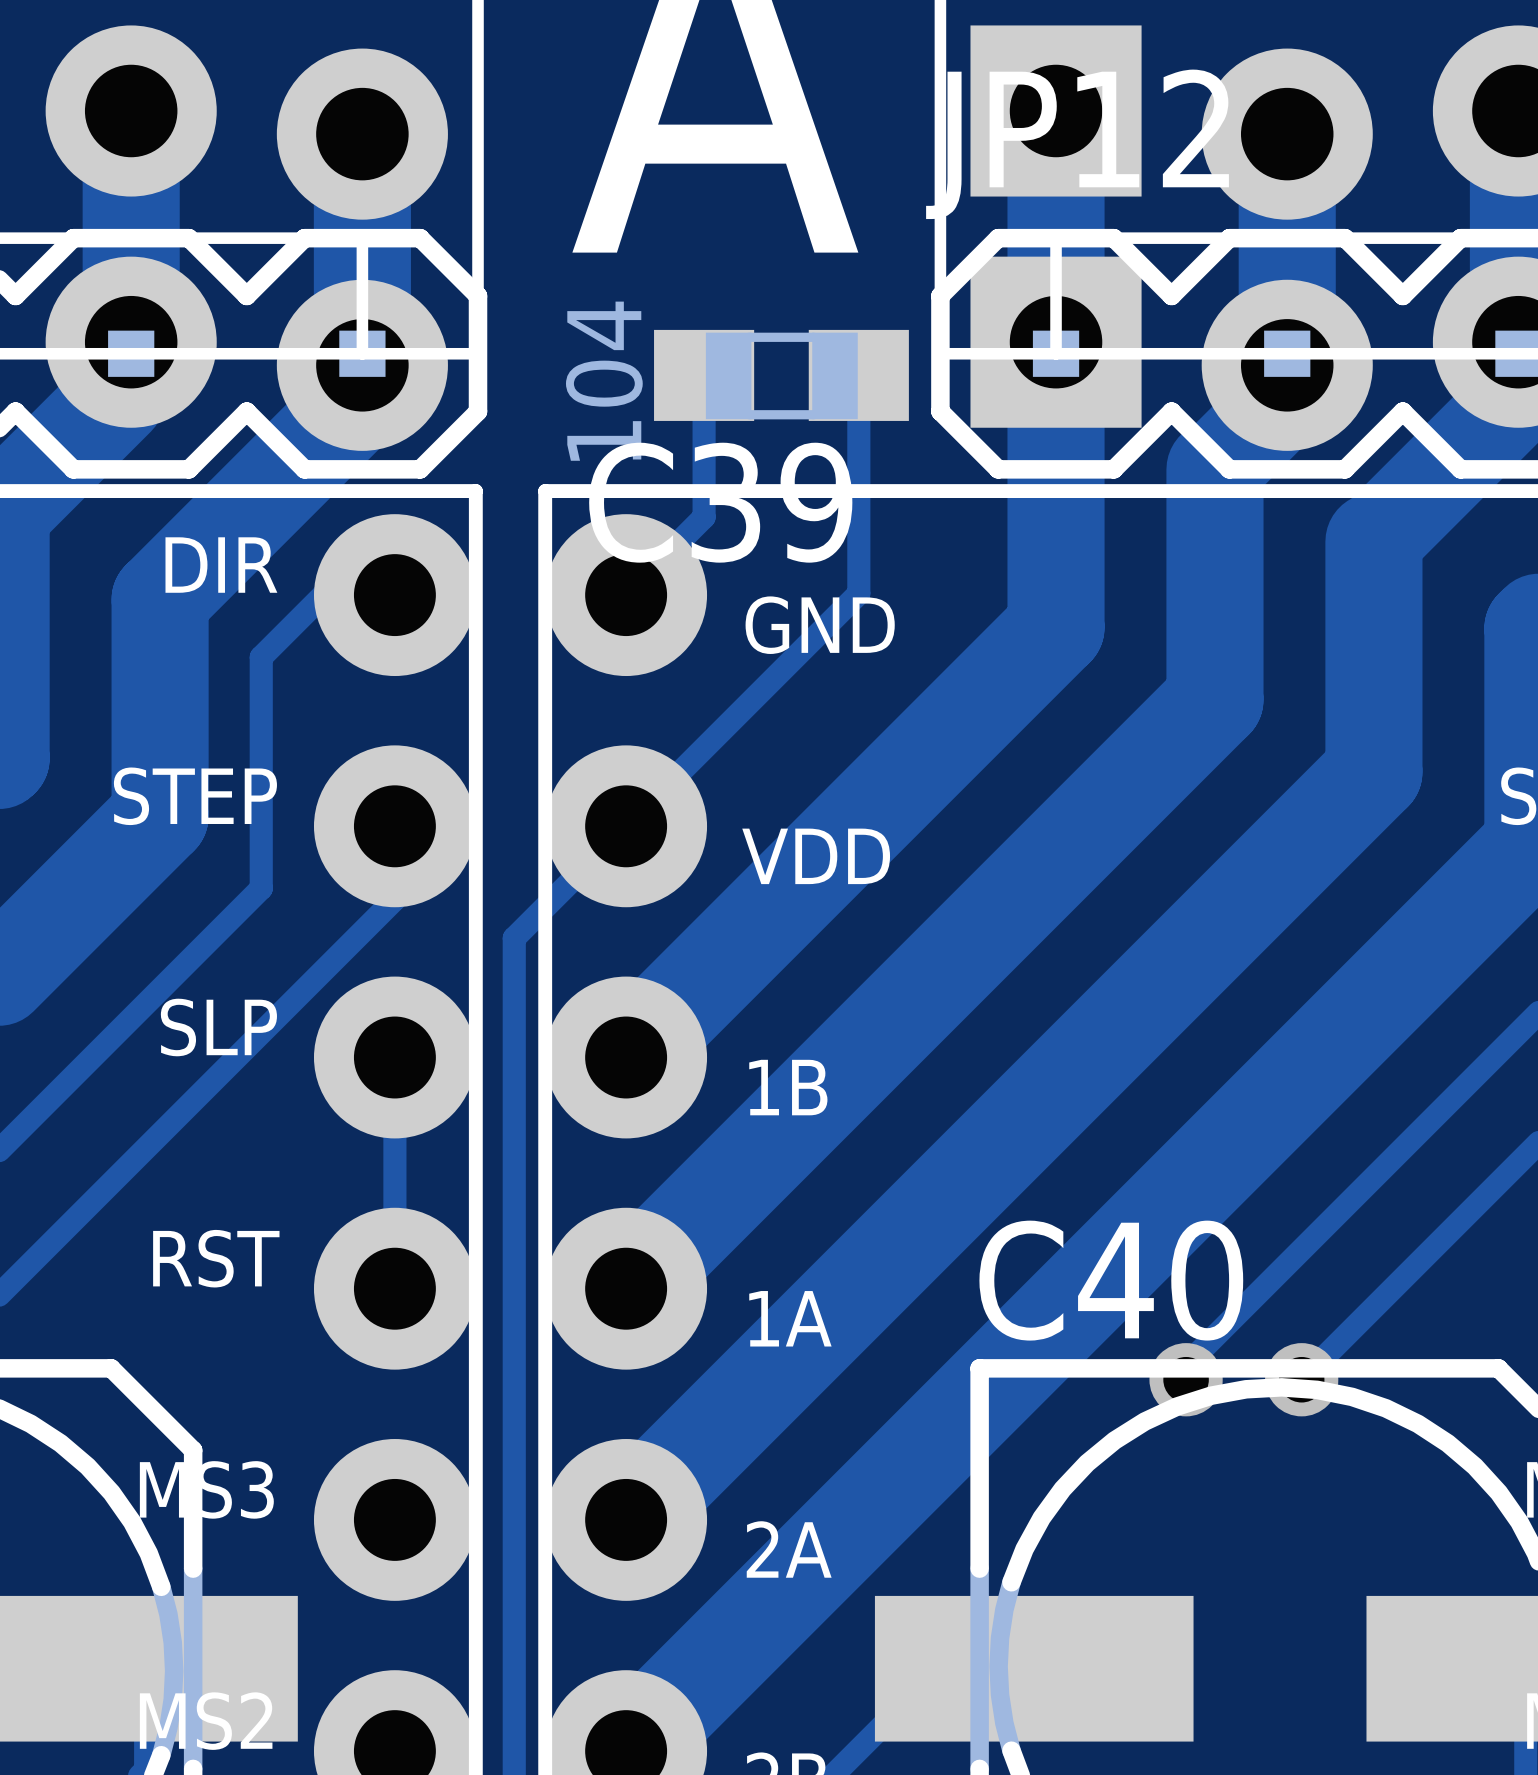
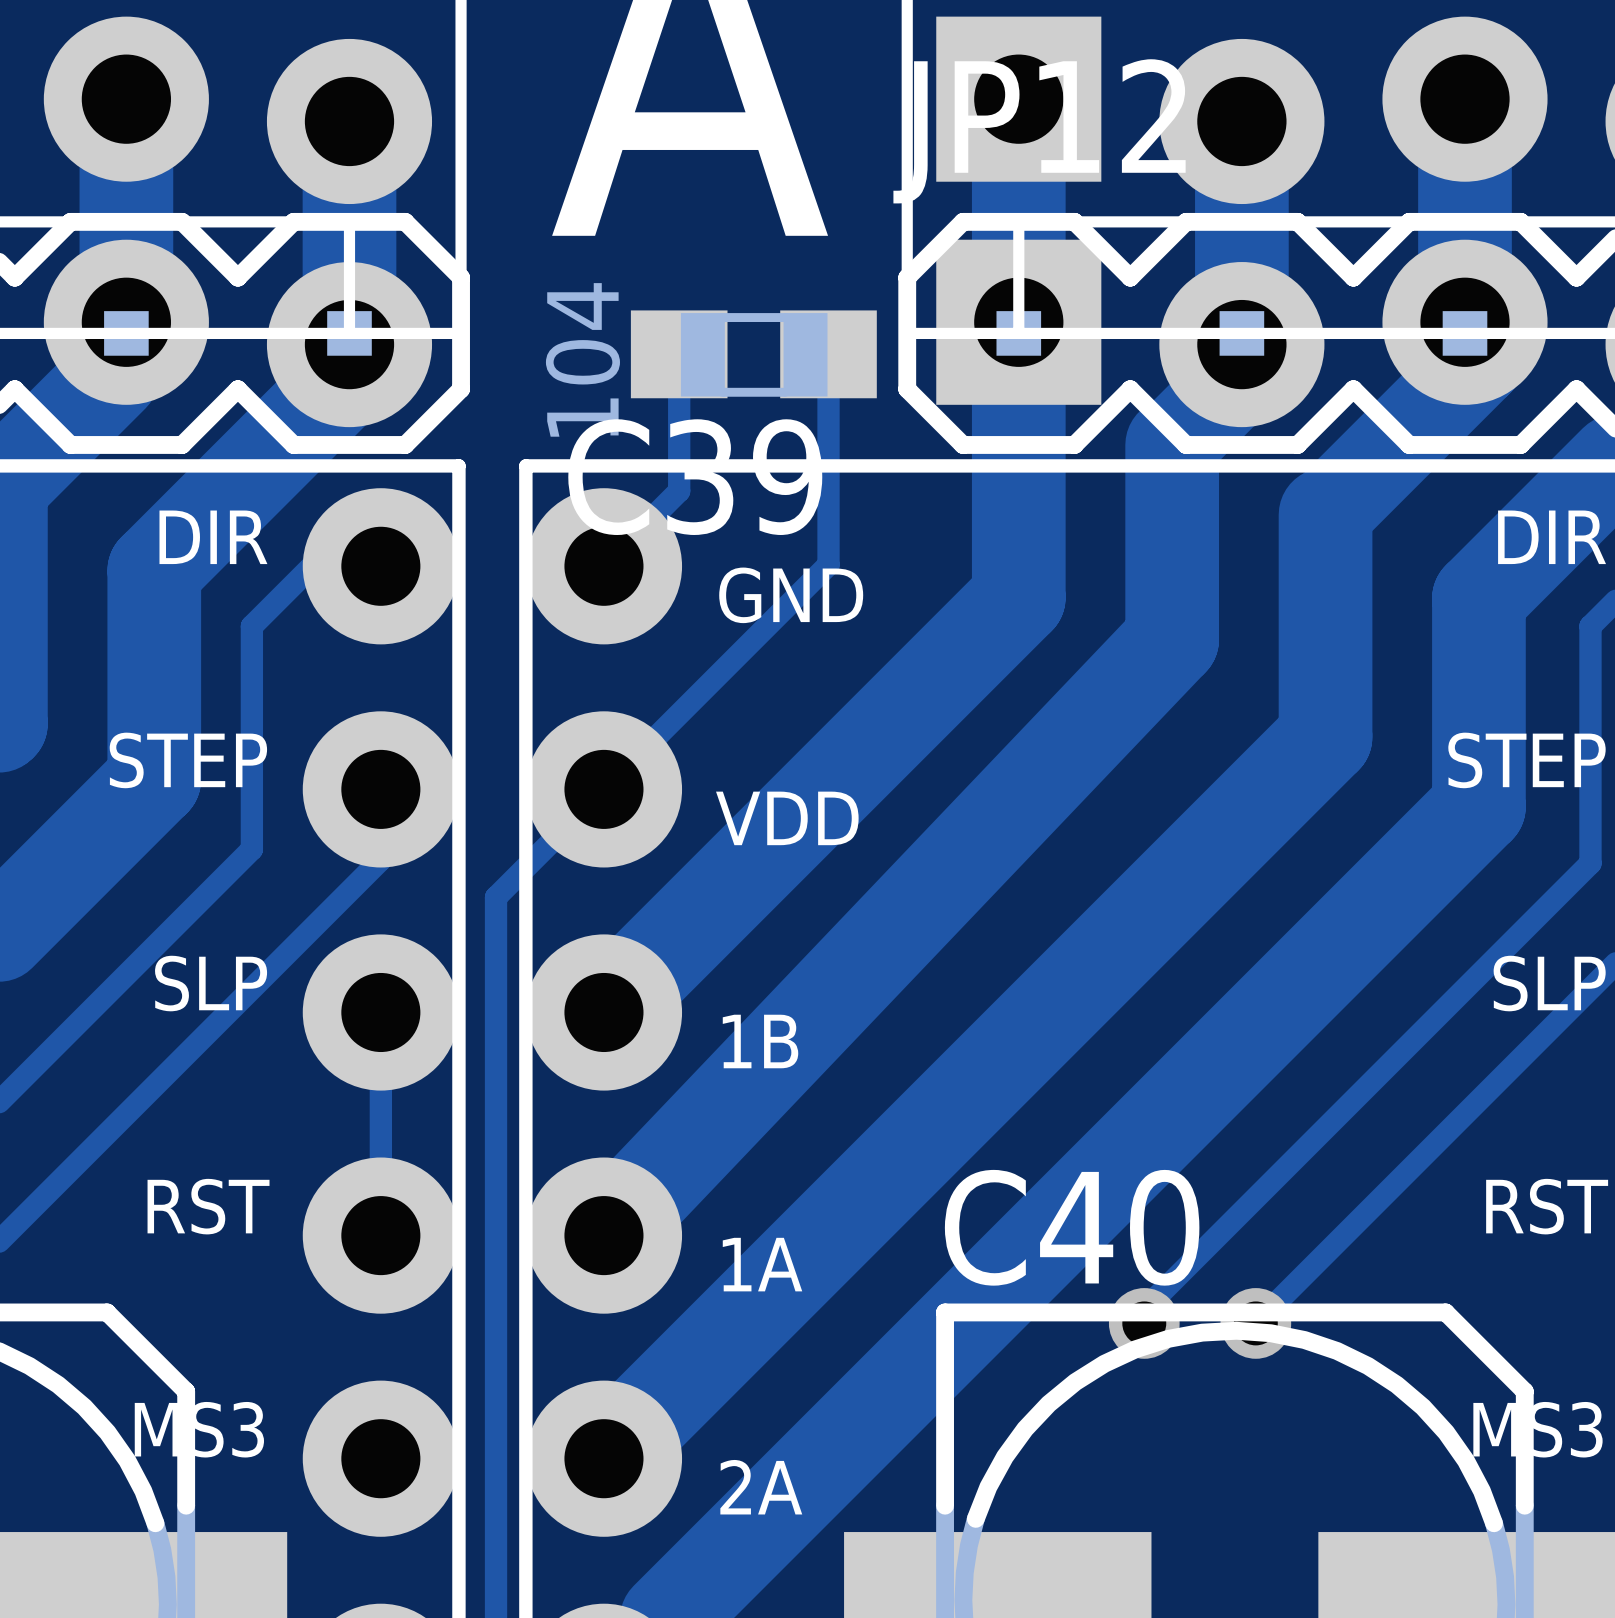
track: (1214, 670) (1214, 699) (626, 1288) -> (1172, 639) (603, 1235)

